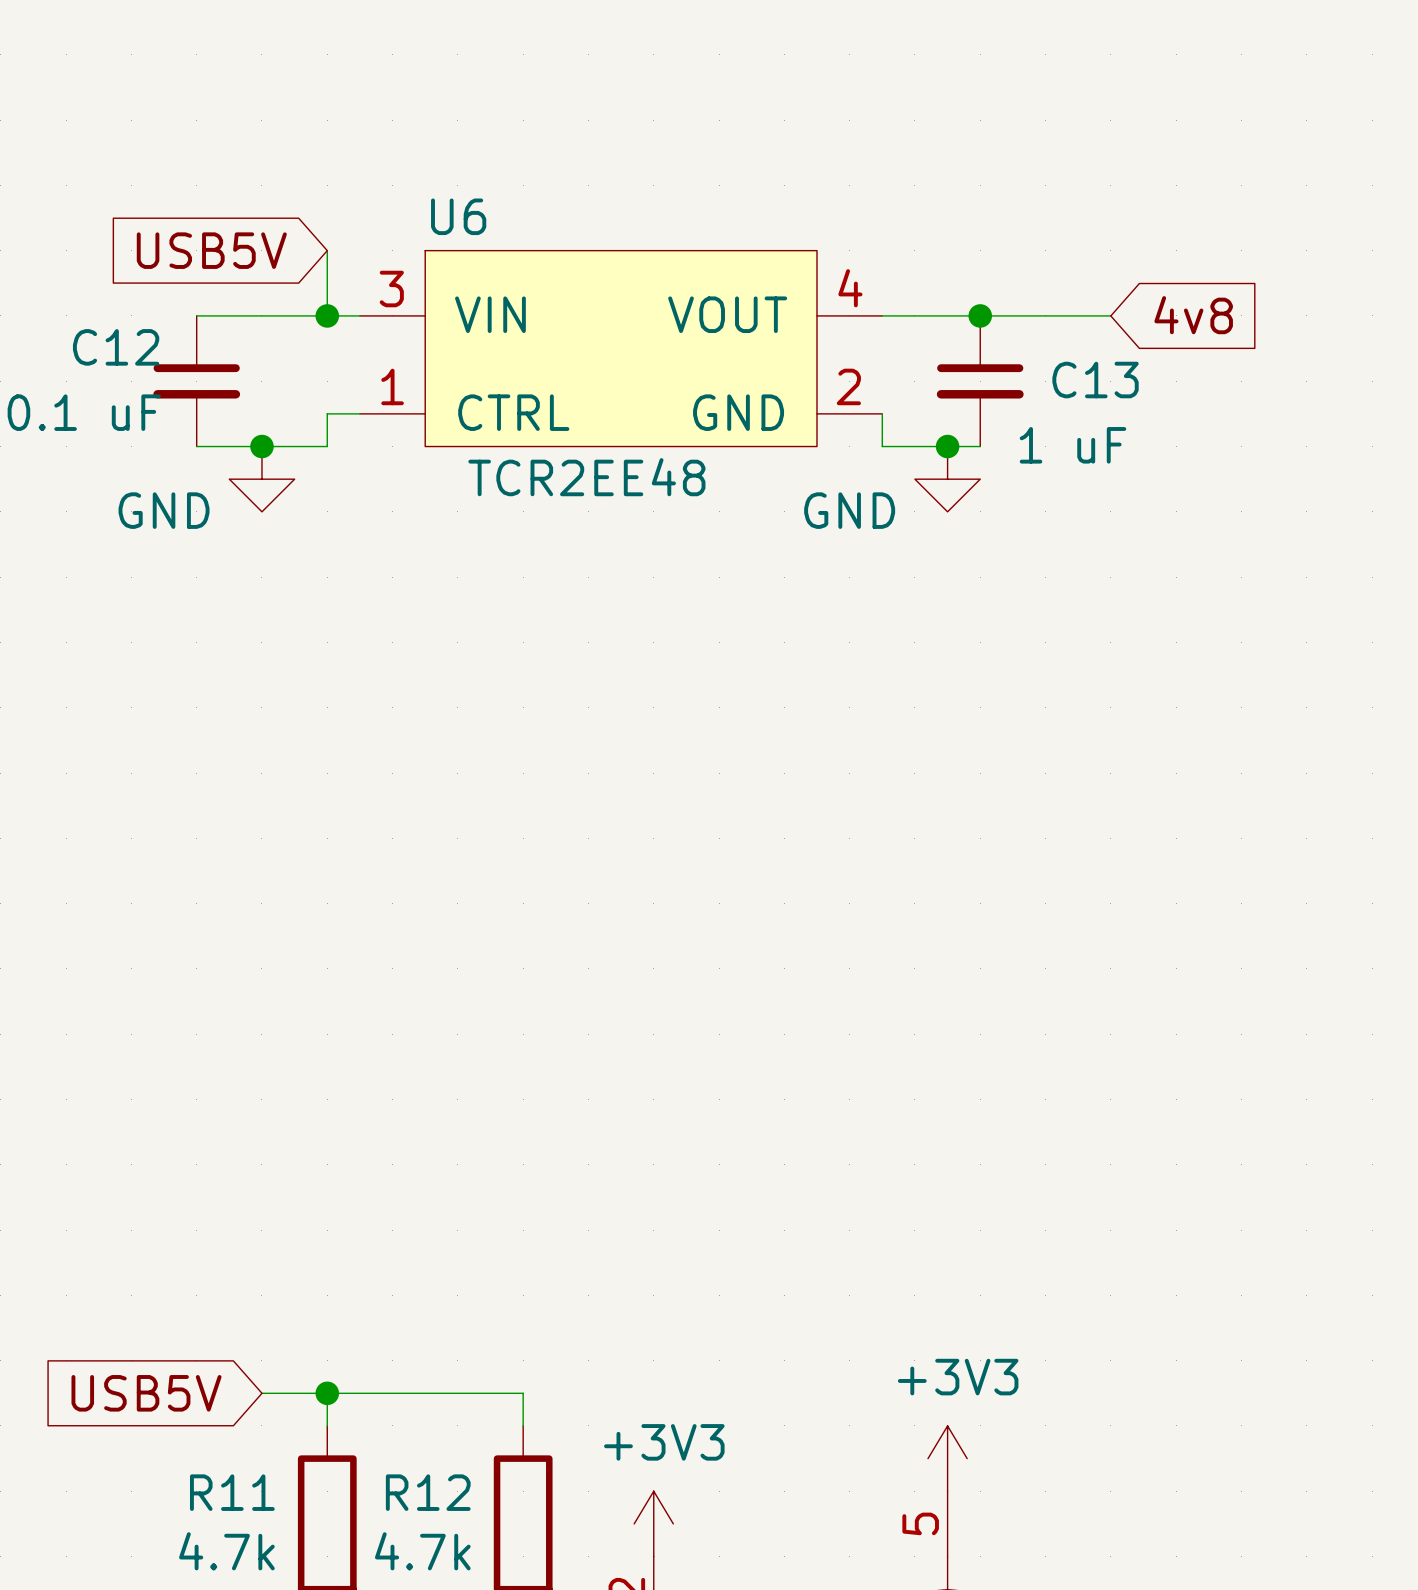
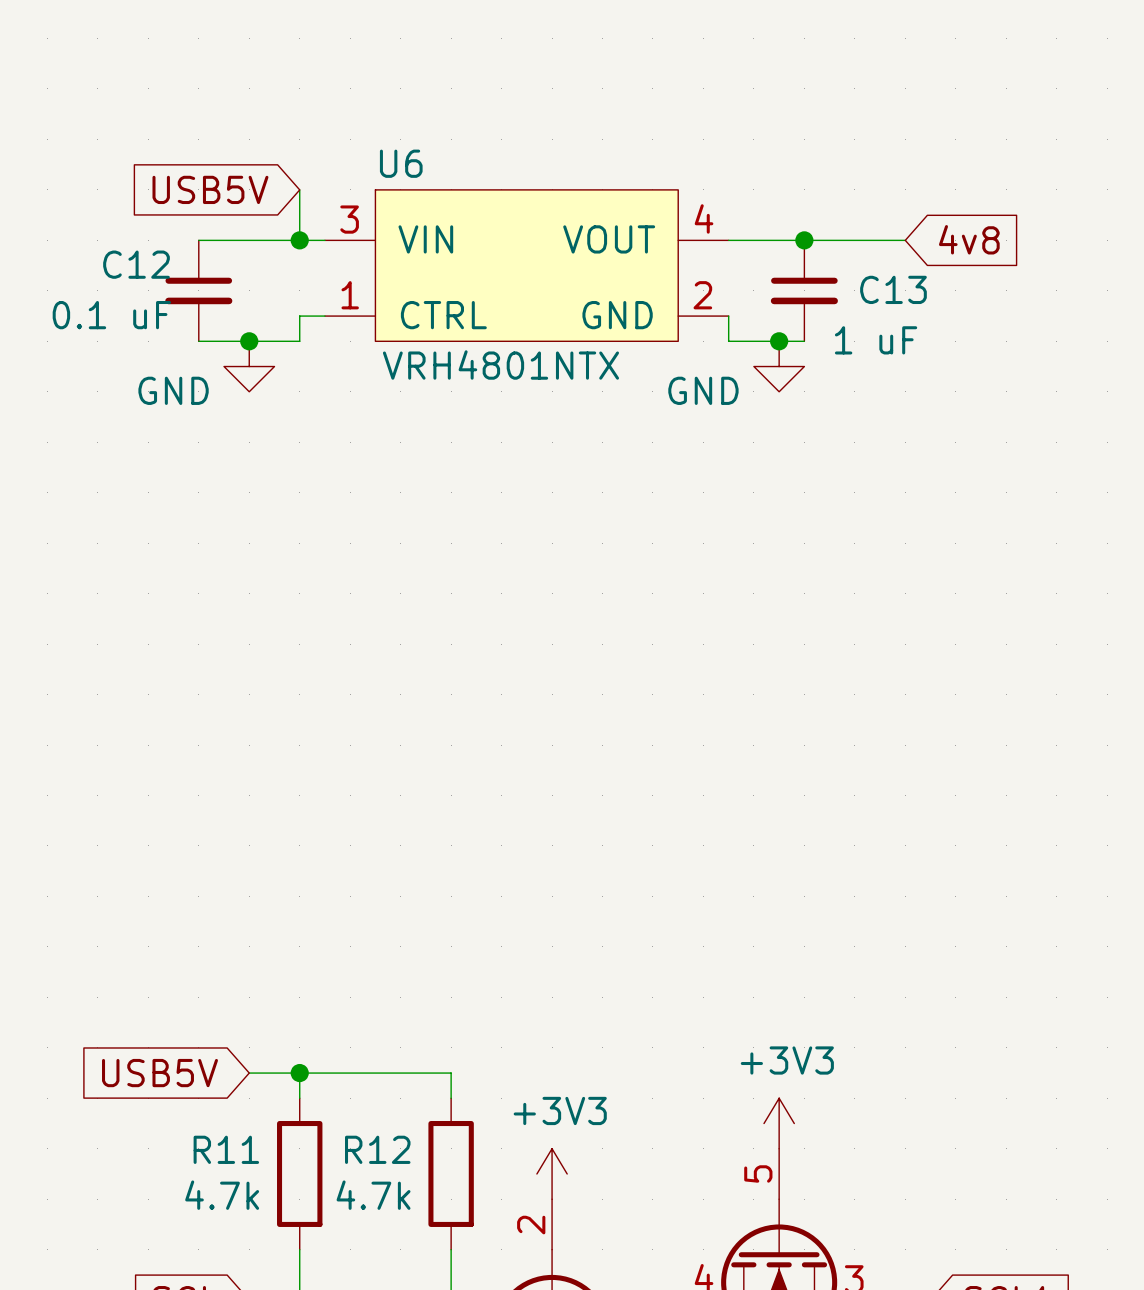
U6 value: TCR2EE48 (586, 477) -> VRH4801NTX (500, 364)

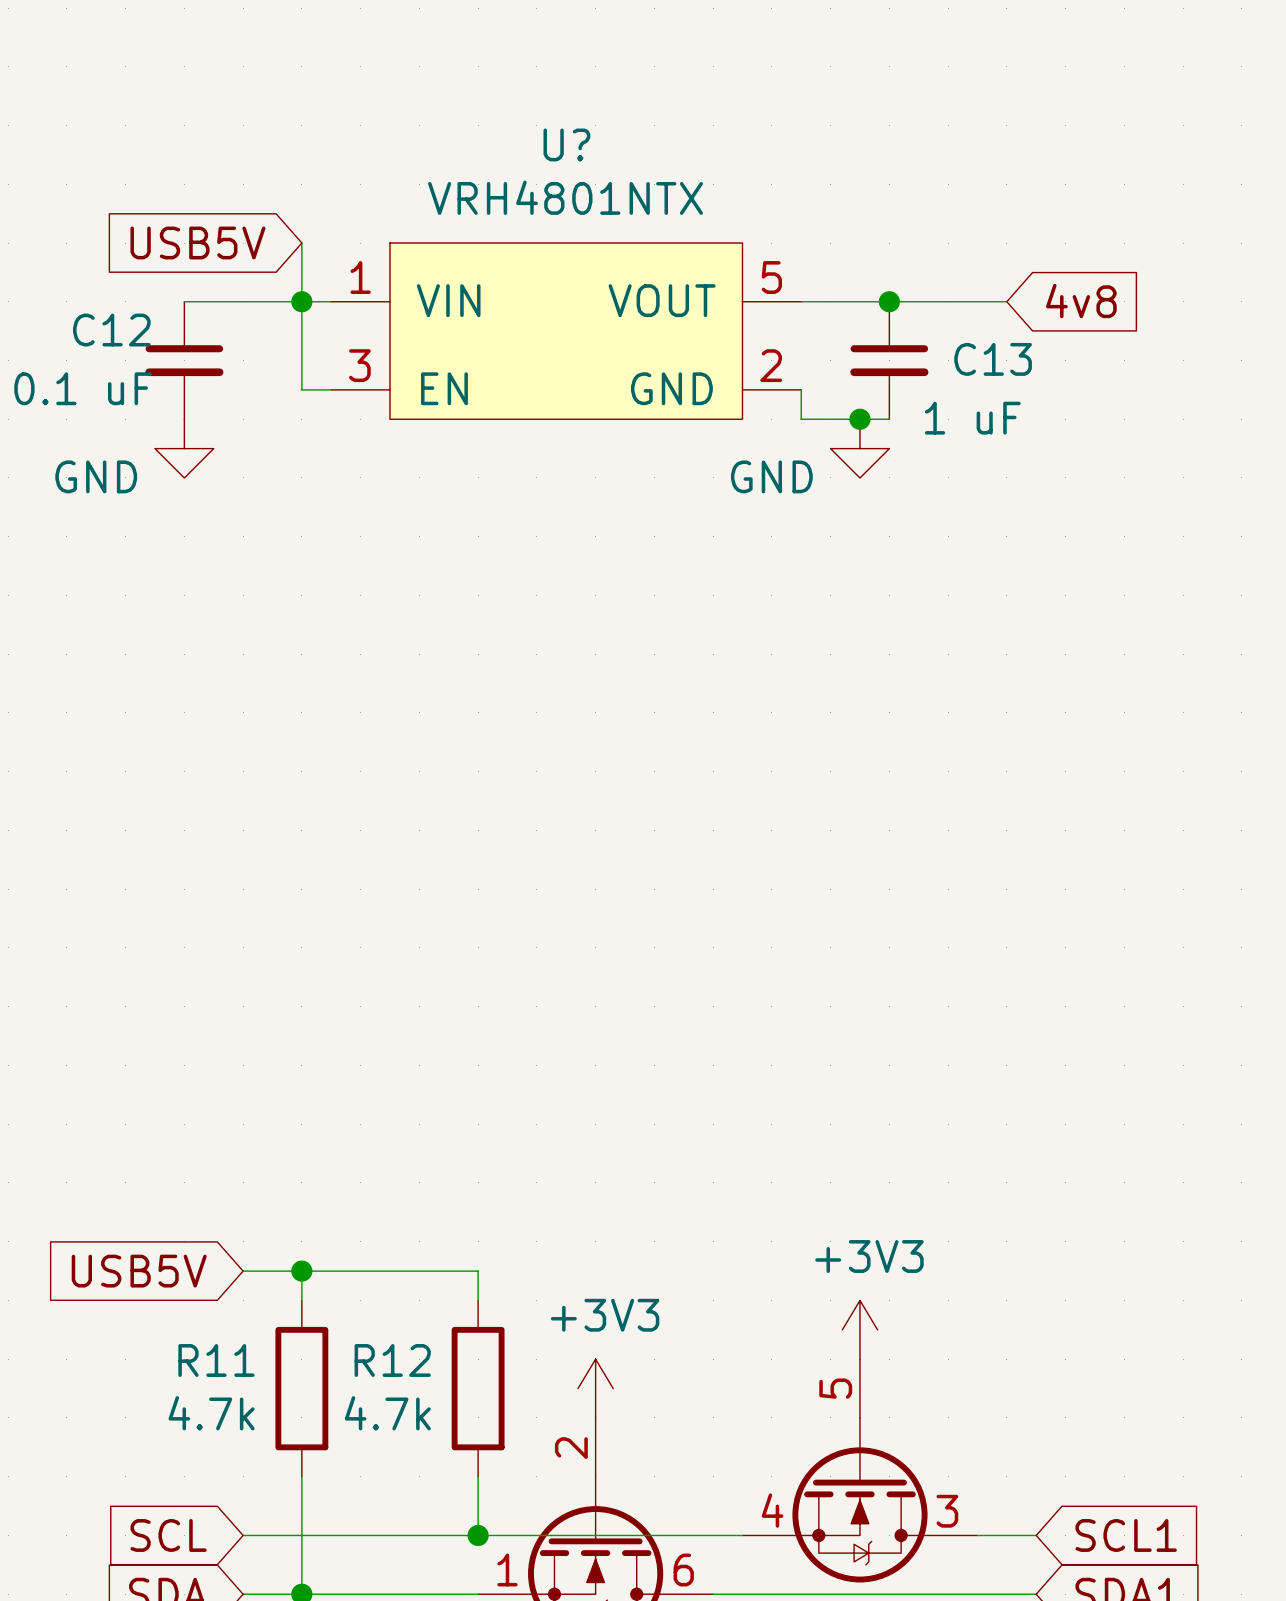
U6 name: U6 (401, 163) -> U? (566, 144)
U6 pin number: 4 (704, 218) -> 5 (771, 277)
U6 pin number: 3 (349, 219) -> 1 (360, 277)
U6 pin number: 1 (350, 295) -> 3 (359, 365)
U6 pin name: CTRL (443, 315) -> EN (444, 388)
wire: (299, 316) (299, 341) (198, 341) -> (301, 389) (301, 301)
junction: (249, 341) -> none
U6 value position: VRH4801NTX (500, 364) -> VRH4801NTX (565, 197)
power symbol position: GND (249, 366) -> GND (184, 448)

